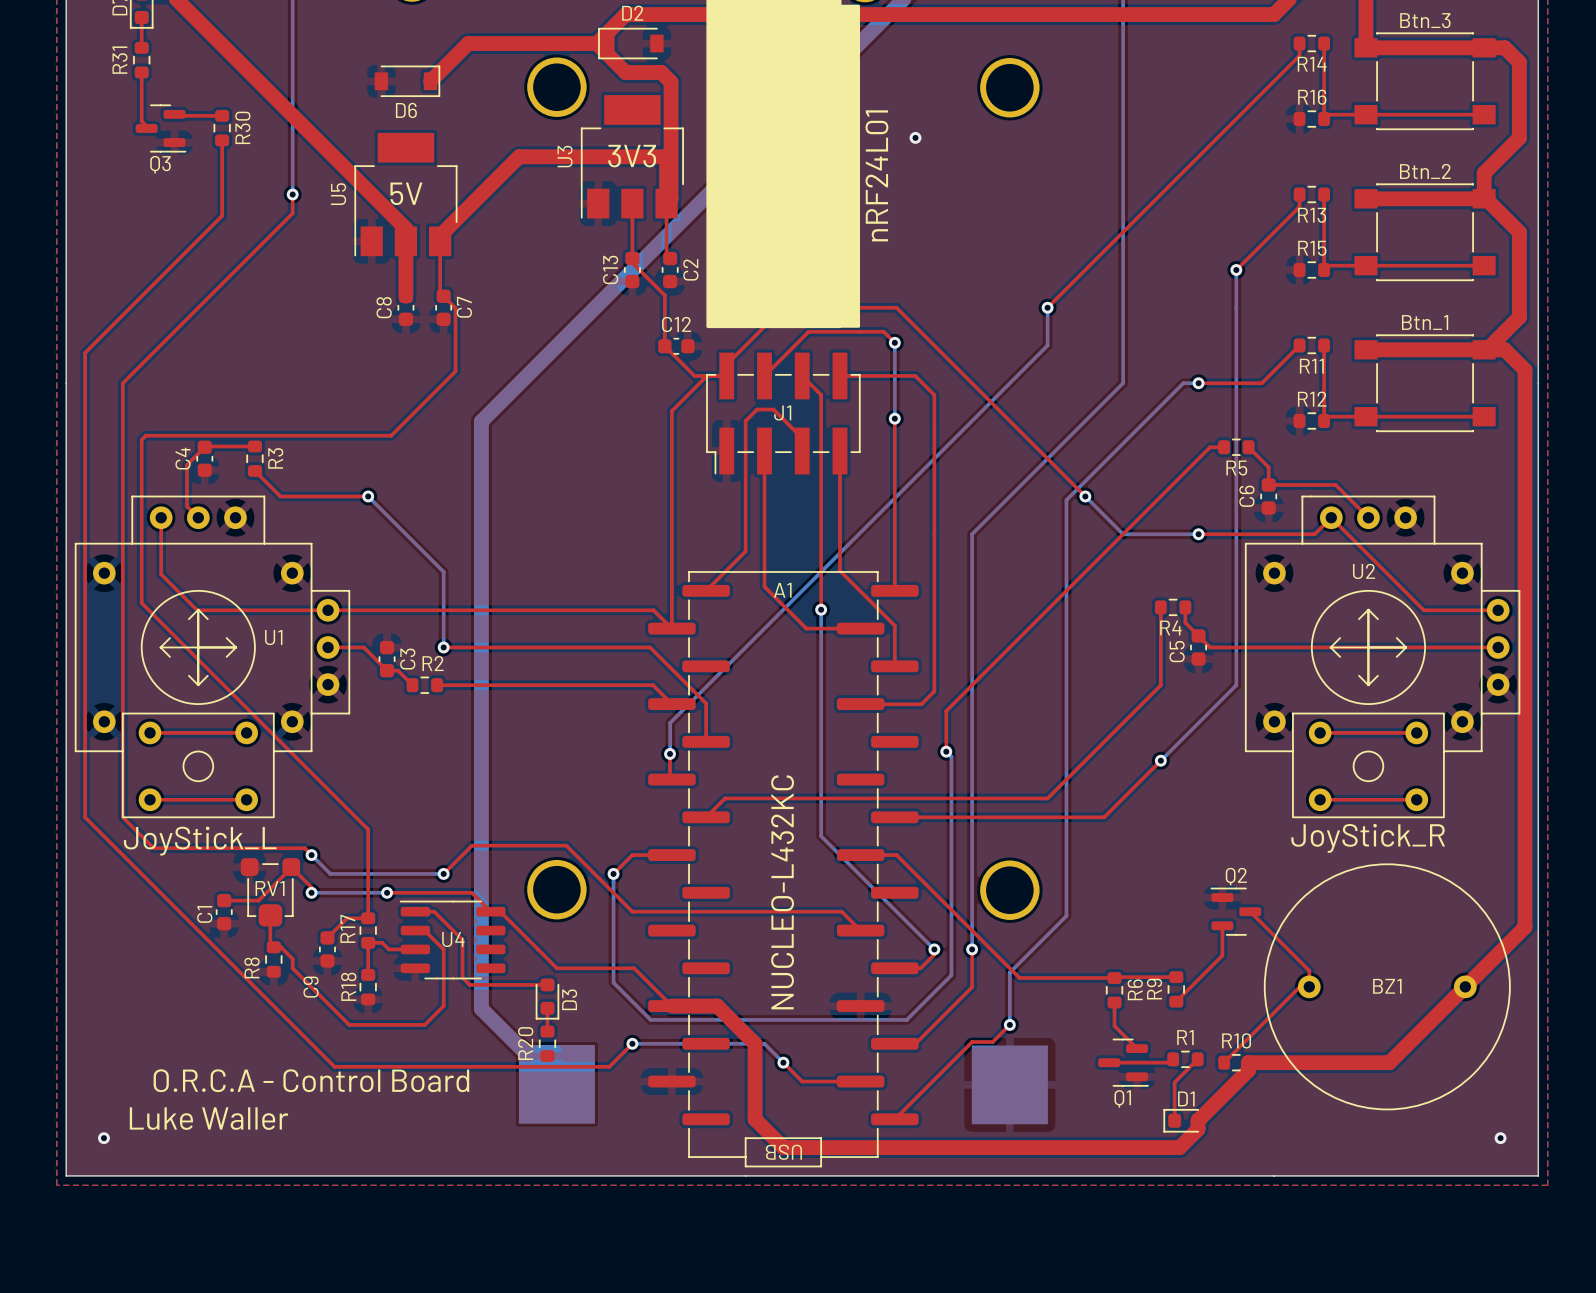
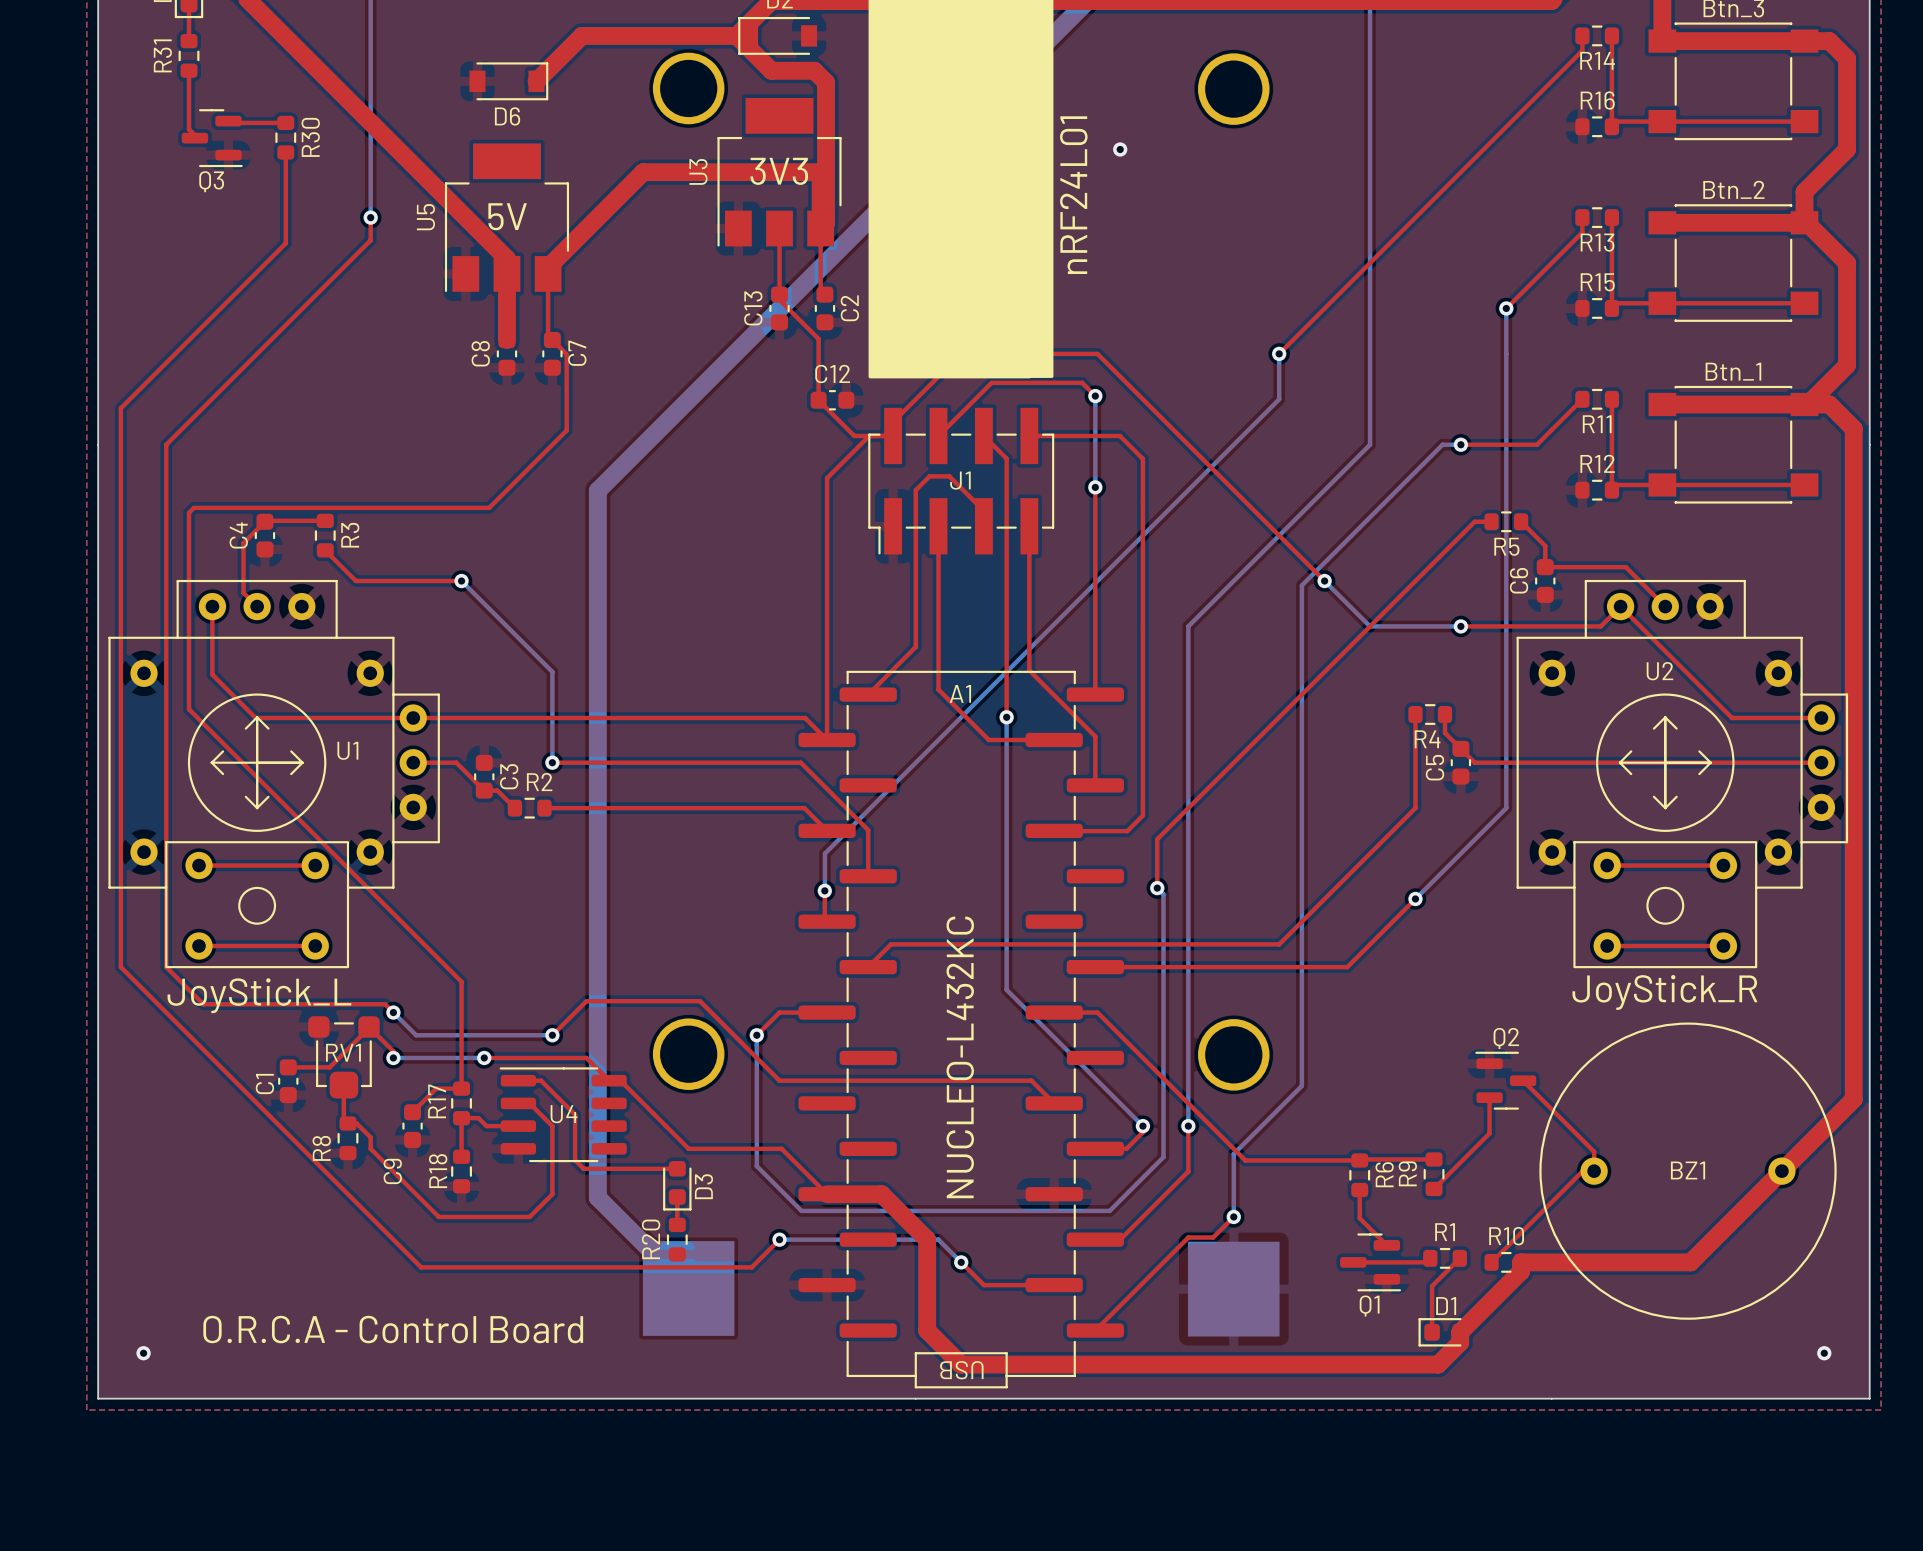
text position: O.R.C.A - Control Board (311, 1080) -> O.R.C.A - Control Board (393, 1329)
text: Luke Waller (209, 1118) -> none

